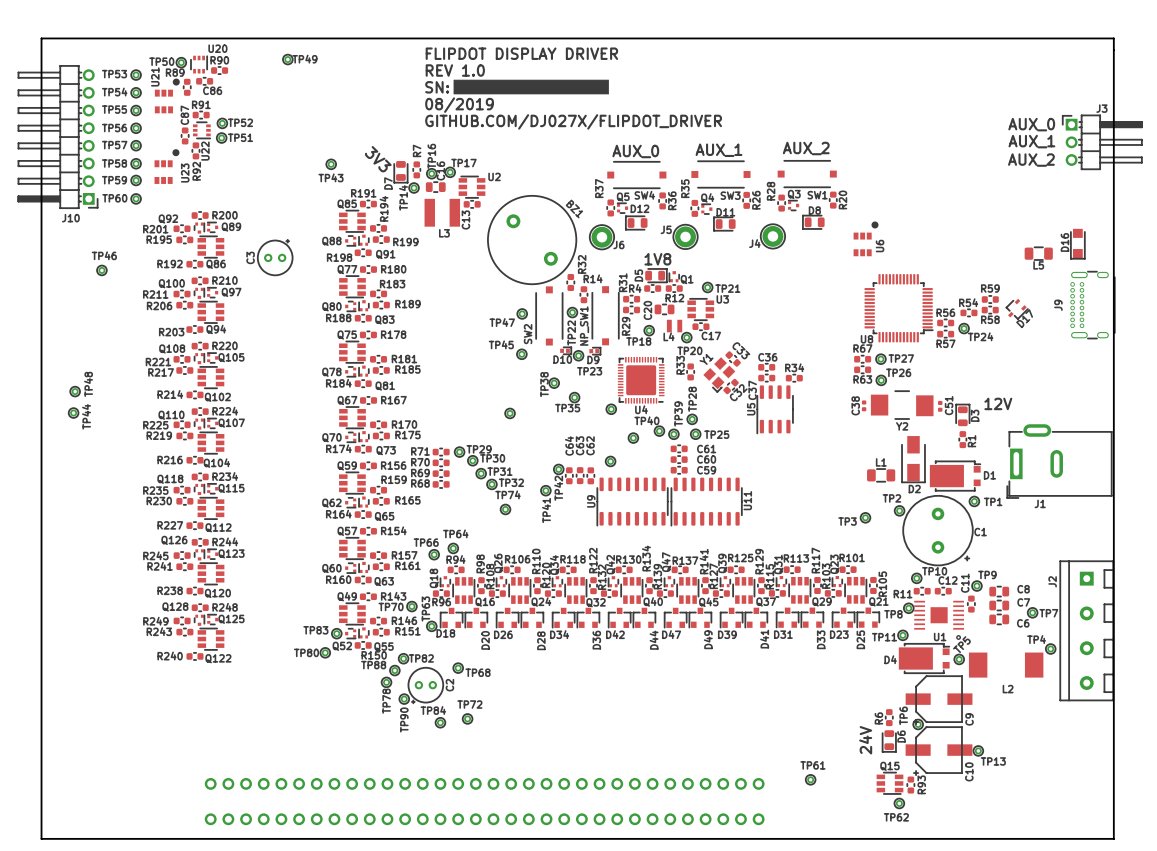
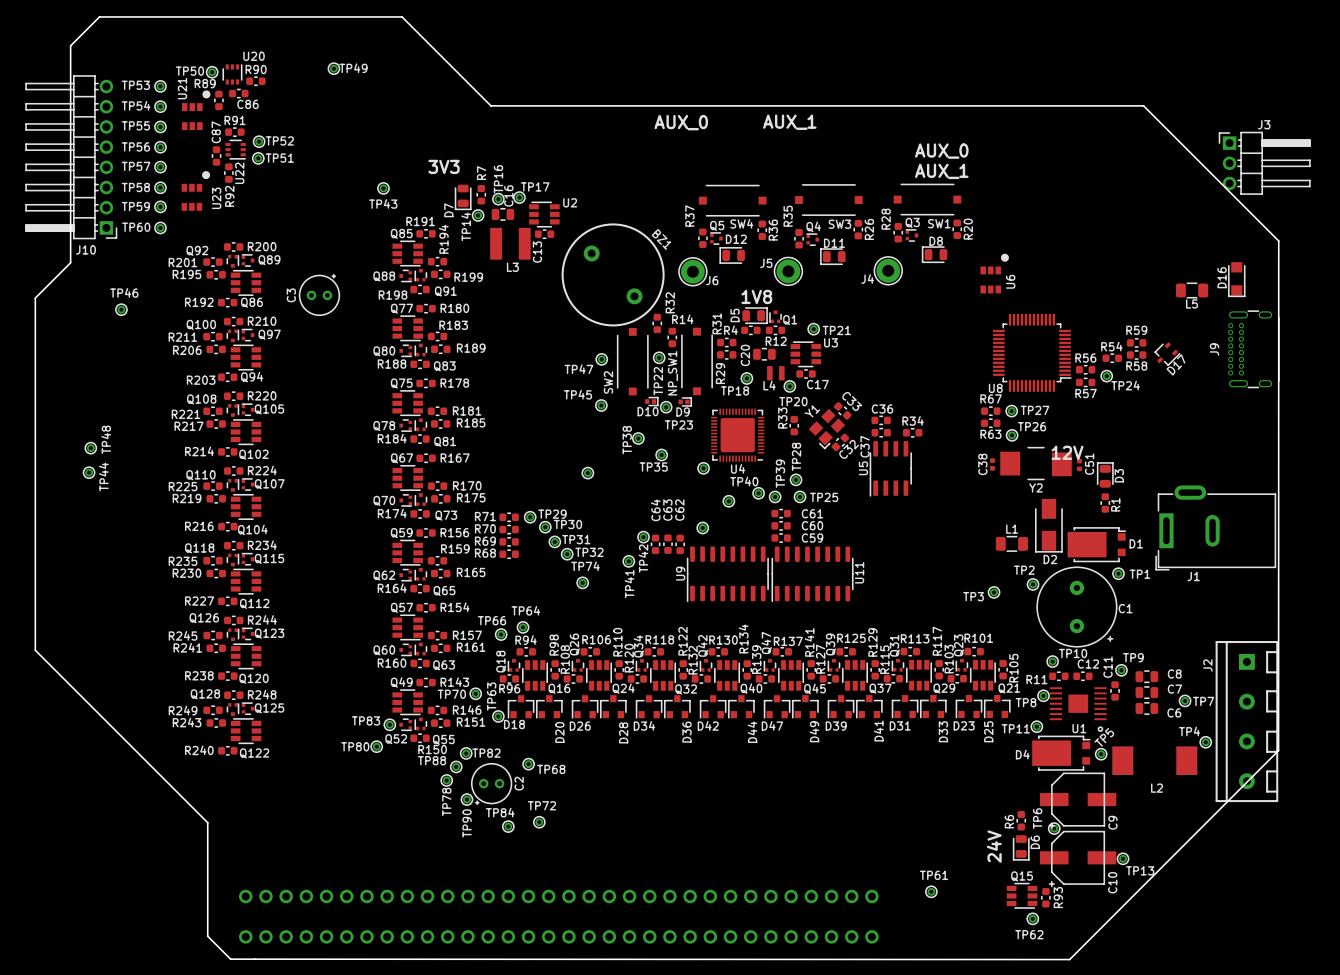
board edge: (41, 38) (41, 838) (1113, 838) (1113, 38) (41, 38) -> (99, 16) (70, 45) (70, 262) (35, 298) (35, 650) (207, 822) (207, 936) (230, 959) (1069, 959) (1278, 750) (1278, 240) (1143, 105) (490, 105) (402, 16) (99, 16)
text: FLIPDOT DISPLAY DRIVER (521, 53) -> none
text: REV 1.0 (455, 70) -> none
drawing: [453, 79, 609, 95] -> none
text: SN: (437, 87) -> none
text: 08/2019 (459, 105) -> none
text: none -> AUX_1 (789, 122)
text: GITHUB.COM/DJ027X/FLIPDOT_DRIVER (573, 121) -> none
text: AUX_0 (1031, 124) -> none
text: none -> AUX_0 (941, 151)
text: AUX_1 (1031, 141) -> none
text: AUX_2 (806, 148) -> none
text: none -> AUX_1 (941, 171)
text: AUX_1 (718, 150) -> none
text position: AUX_0 (635, 151) -> AUX_0 (681, 122)
text rotation: 0° (378, 159) -> 45° counterclockwise (444, 166)
text: AUX_2 (1031, 160) -> none
text position: 12V (998, 403) -> 12V (1067, 452)

